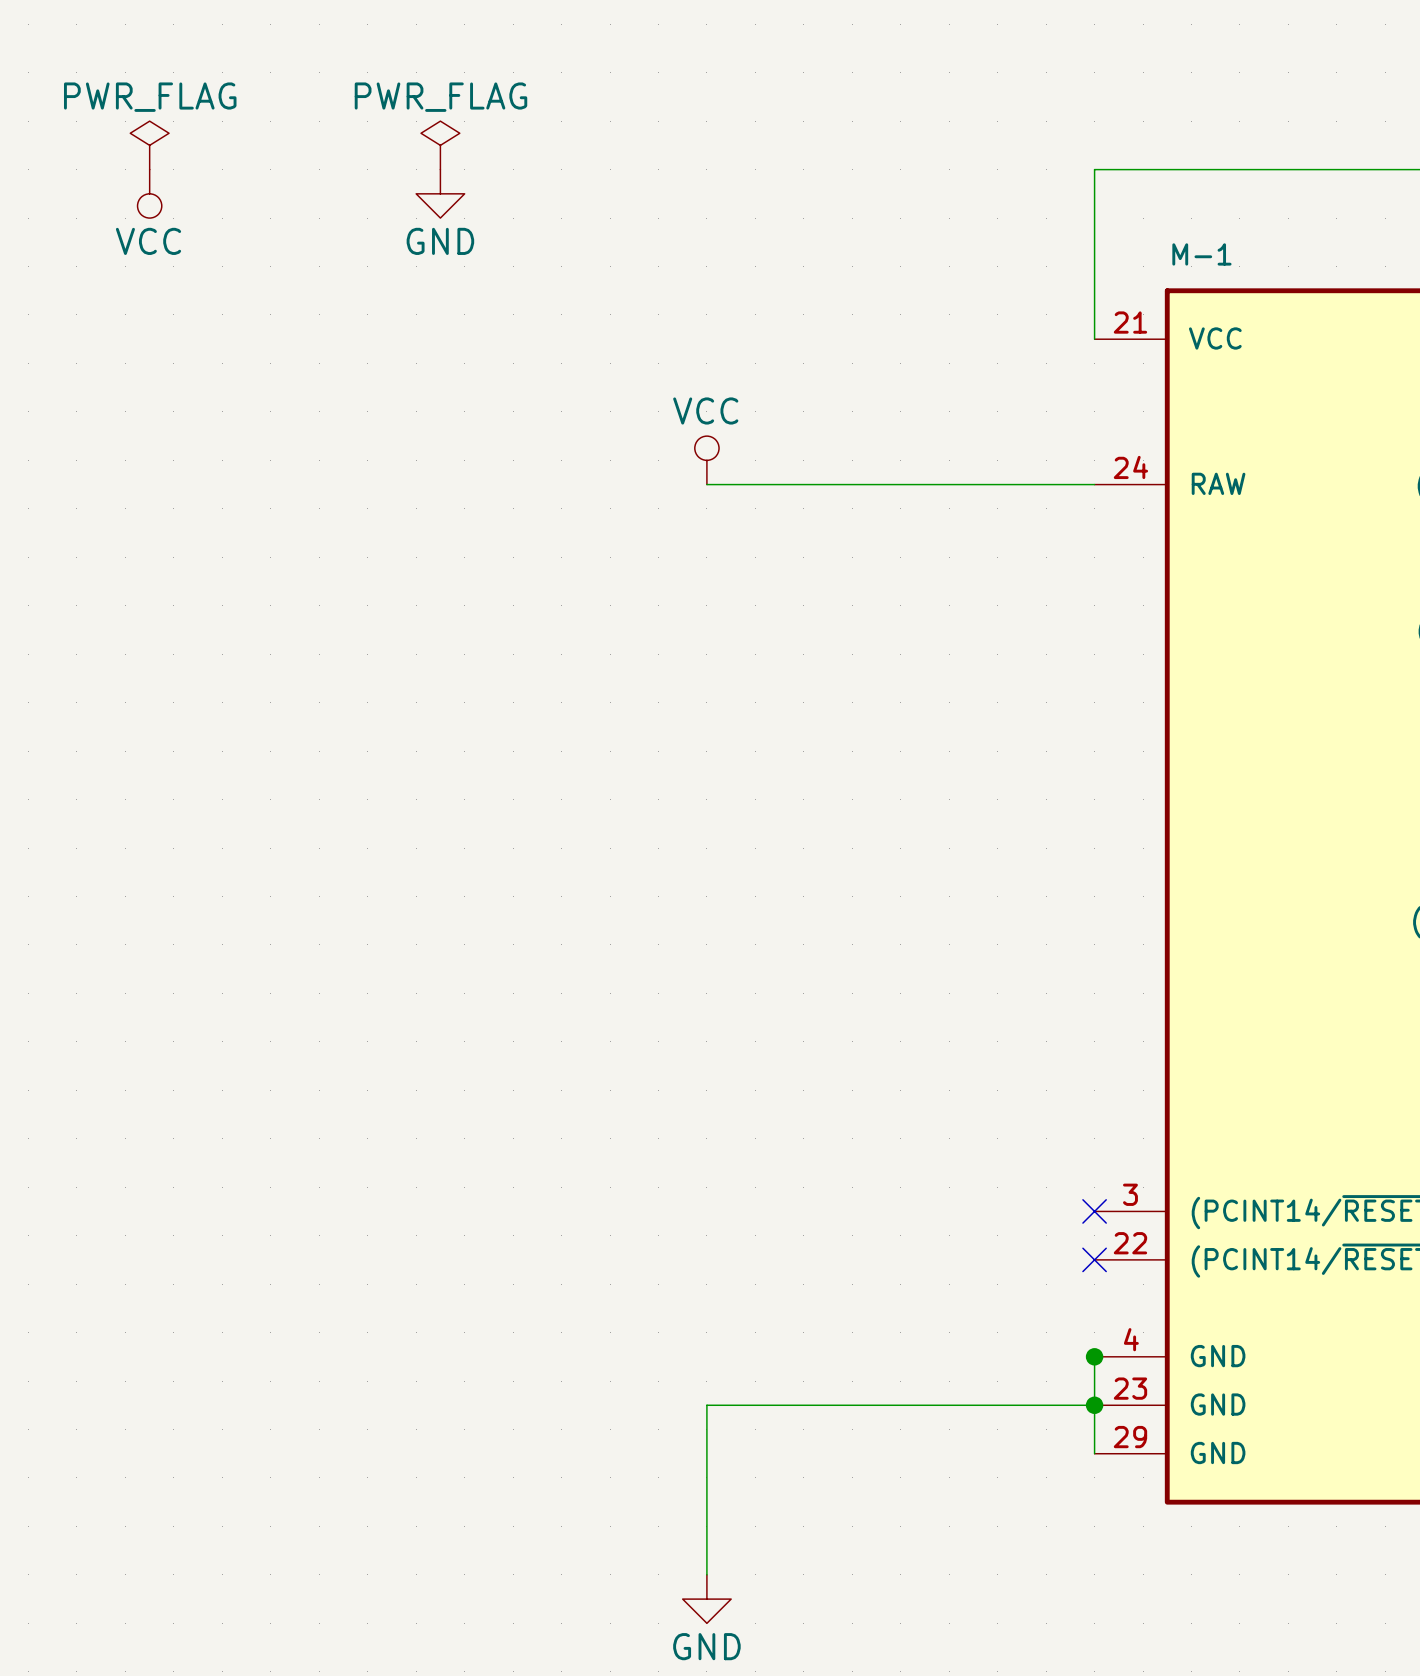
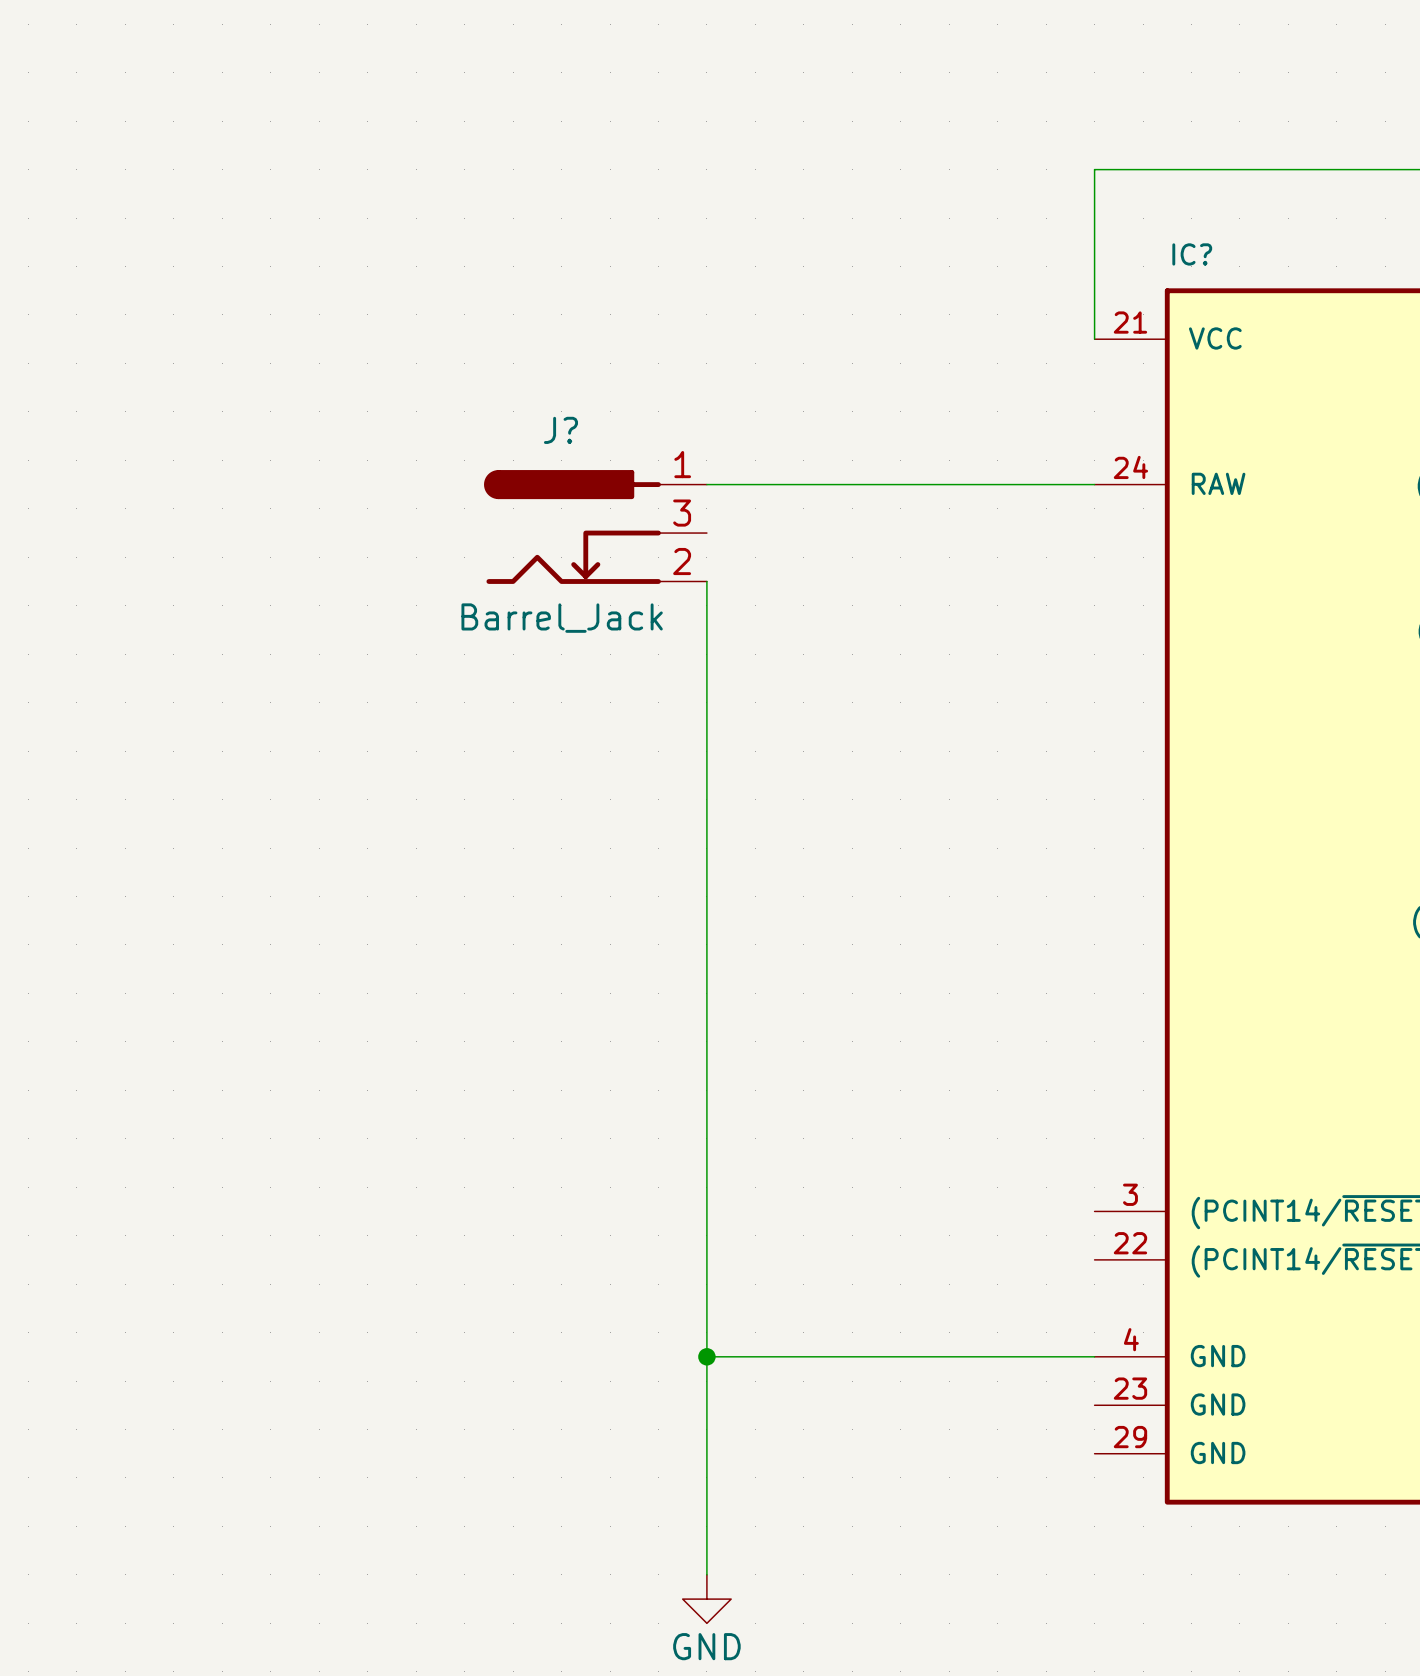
power symbol: PWR_FLAG (149, 145) -> none
power symbol: PWR_FLAG (440, 145) -> none
power symbol: VCC (149, 193) -> none
power symbol: GND (440, 193) -> none
M-1 name: M-1 (1201, 254) -> IC? (1192, 254)
power symbol: VCC (706, 460) -> none
J?: none -> Barrel_Jack (595, 526)
no-connect mark: (1094, 1211) -> none
no-connect mark: (1094, 1259) -> none
junction: none -> (706, 1356)
wire: (1094, 1356) (1094, 1453) -> (1094, 1356) (706, 1356)
junction: (1094, 1356) -> none
wire: (706, 1405) (1094, 1405) -> (706, 1405) (706, 581)
junction: (1094, 1405) -> none

